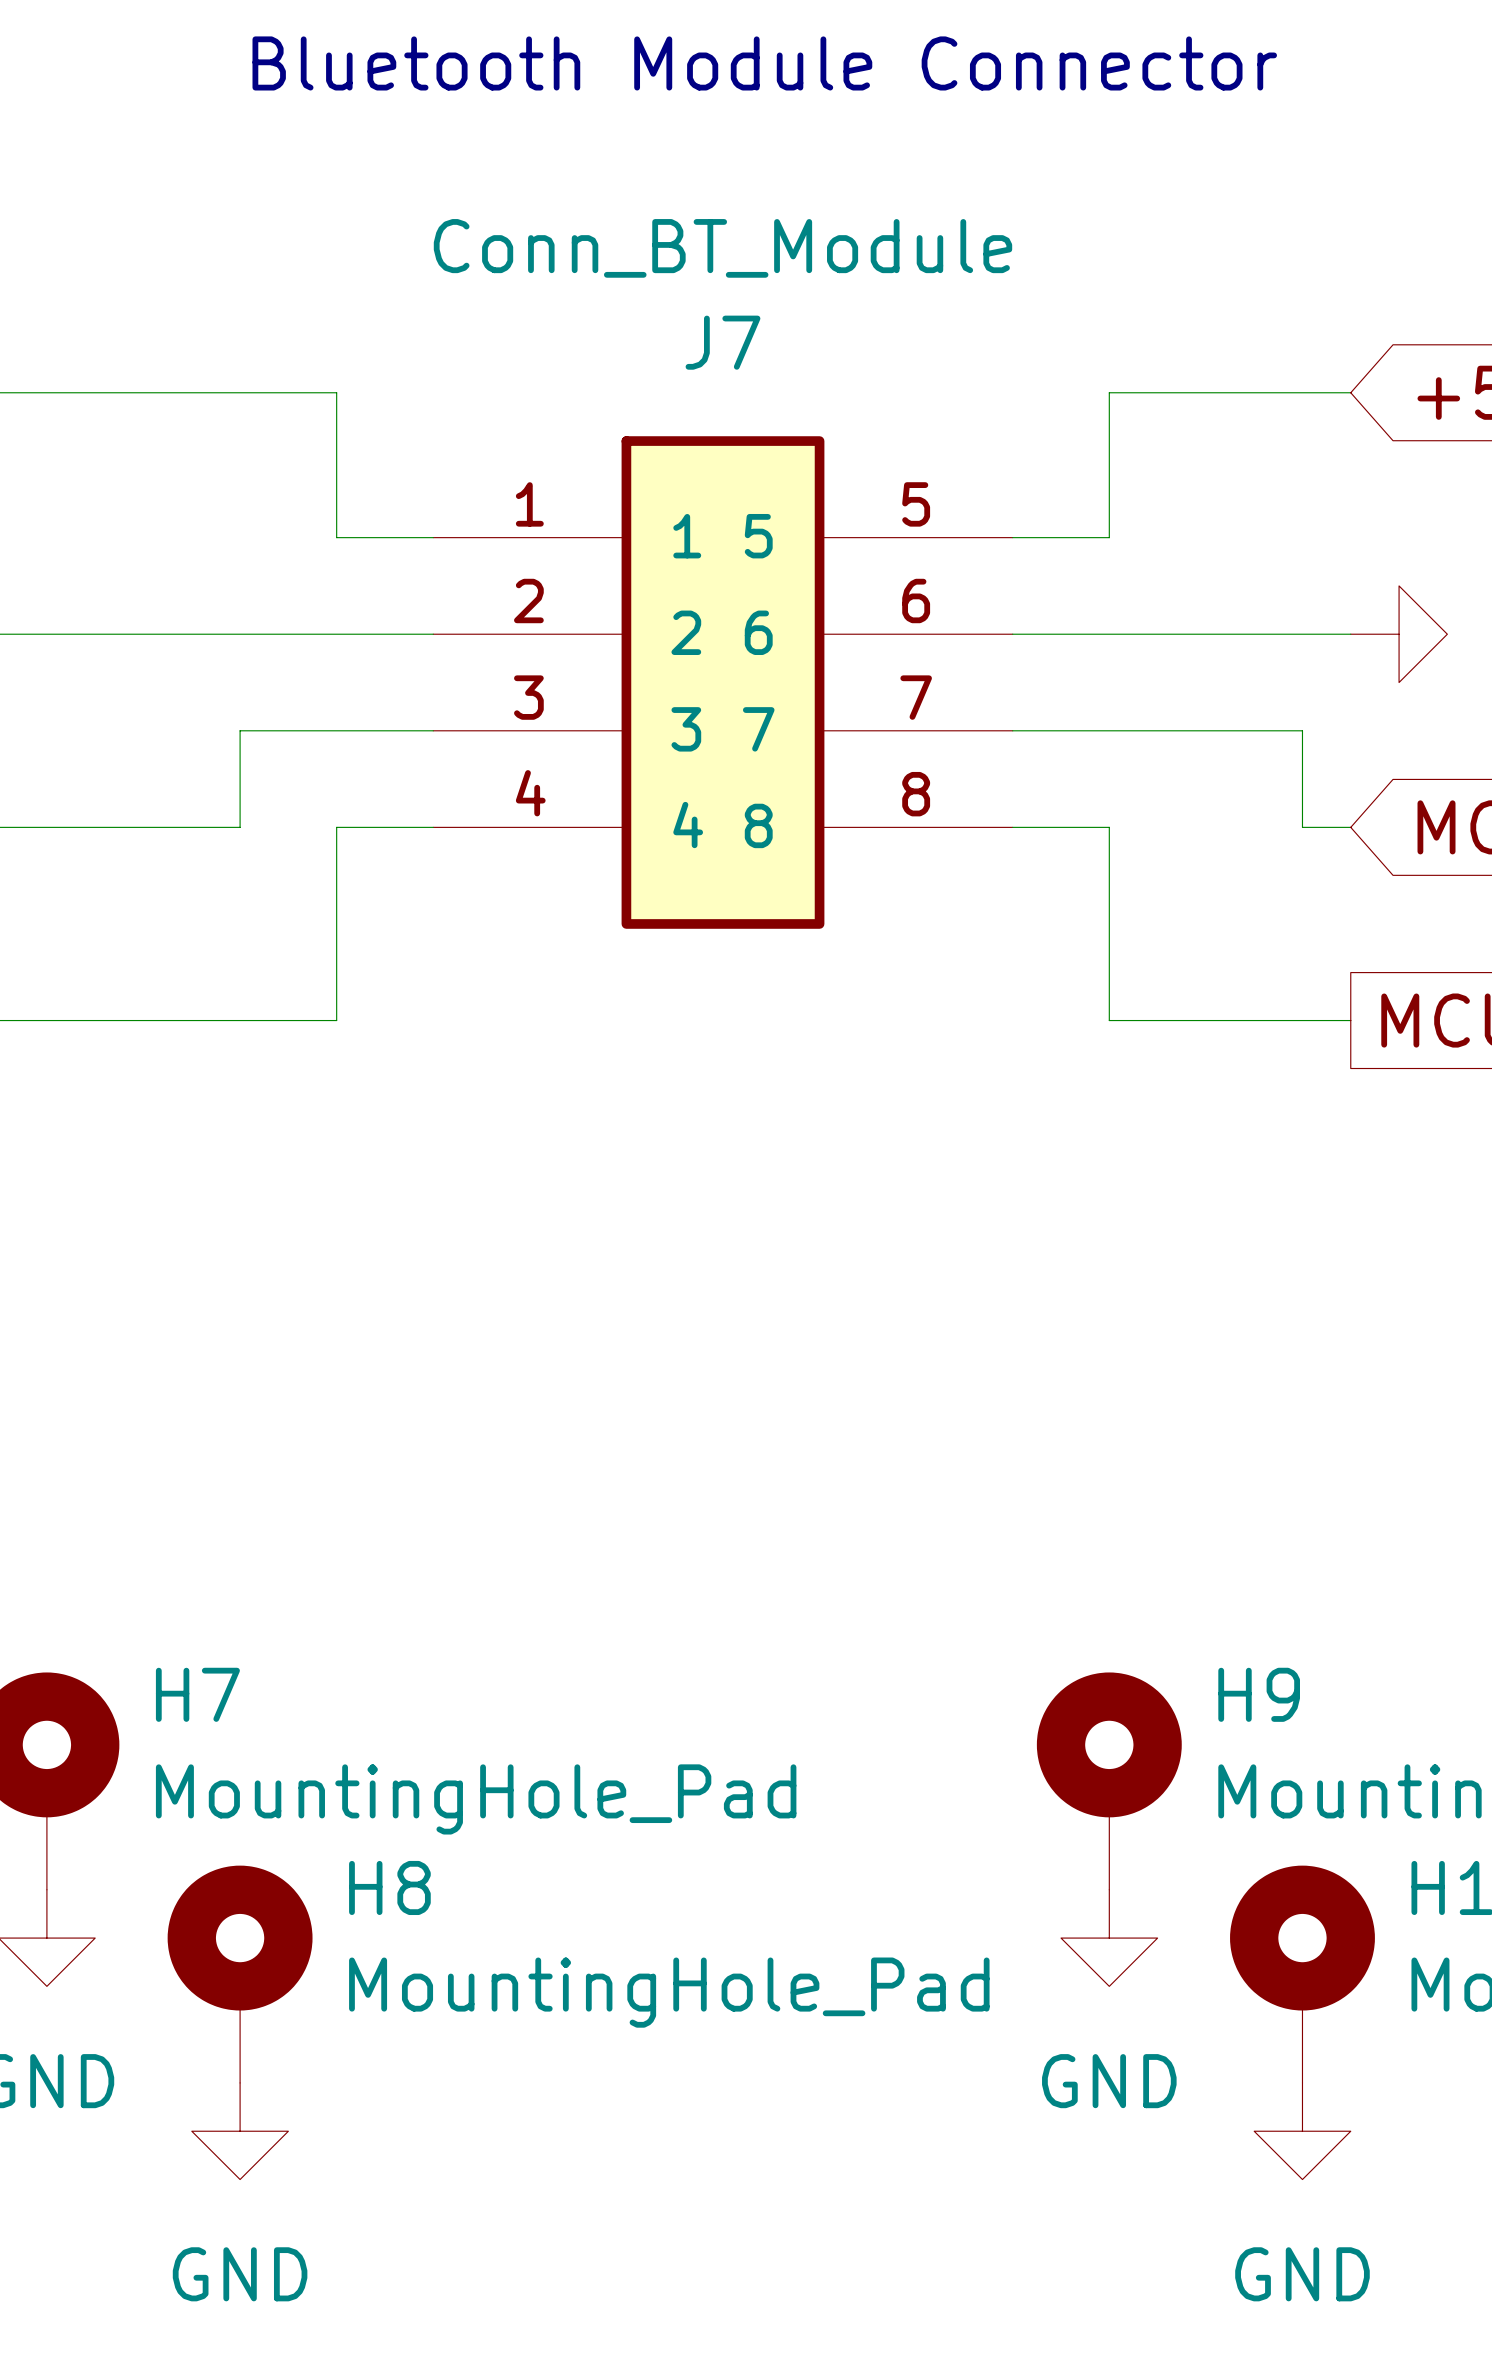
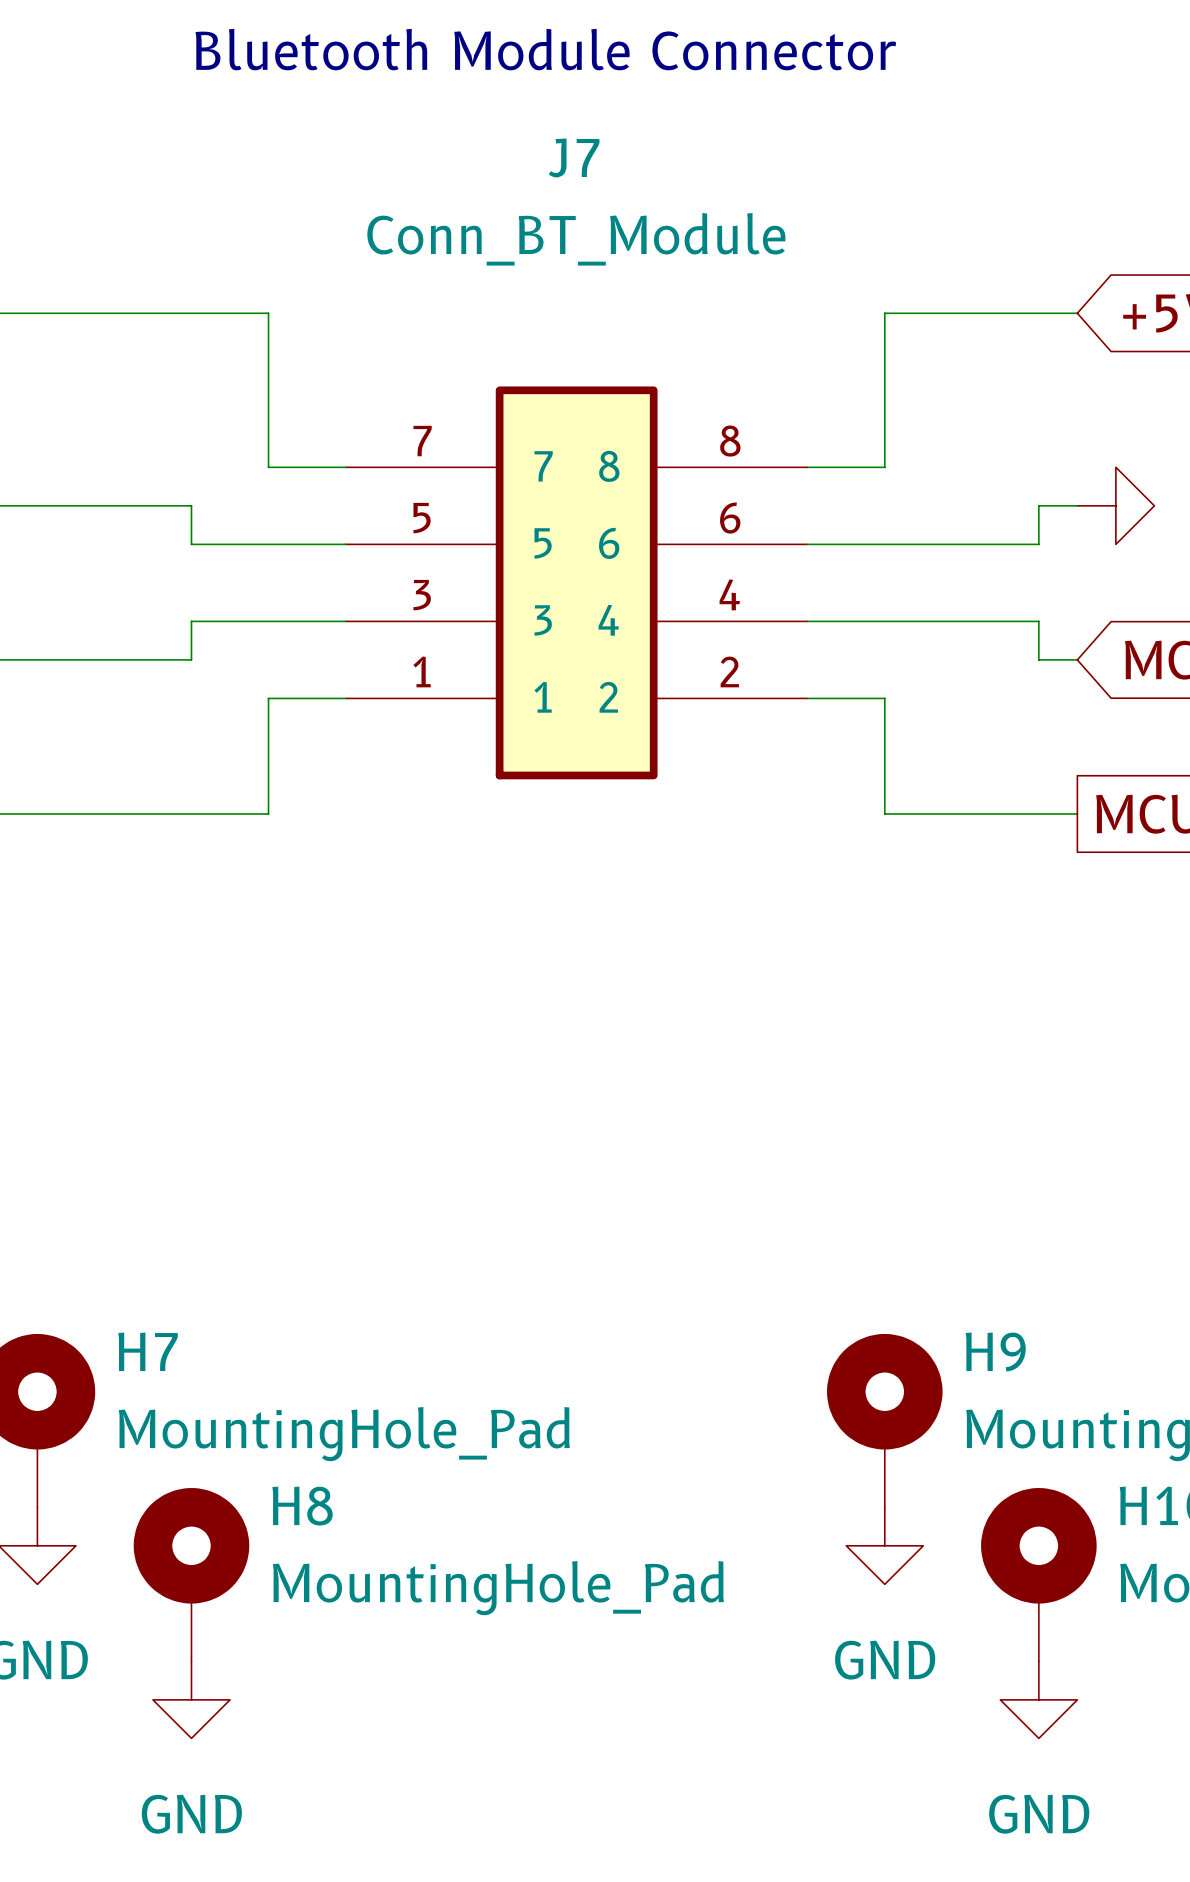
J7 name position: J7 (722, 342) -> J7 (574, 157)
J7 symbol: [433, 436, 1013, 929] -> [345, 386, 808, 780]
wire: (336, 537) (433, 537) -> (268, 428) (268, 467) (345, 467)
wire: (1012, 537) (1109, 537) -> (807, 467) (884, 467) (884, 428)
wire: (240, 634) (433, 634) -> (191, 505) (191, 544) (345, 544)
wire: (1012, 634) (1302, 634) -> (807, 544) (1038, 544) (1038, 505)
wire: (433, 730) (240, 730) (240, 779) -> (345, 621) (191, 621)
wire: (1012, 730) (1302, 730) (1302, 779) -> (807, 621) (1038, 621)
wire: (433, 827) (336, 827) (336, 875) -> (345, 698) (268, 698)
wire: (1012, 827) (1109, 827) (1109, 875) -> (807, 698) (884, 698)

